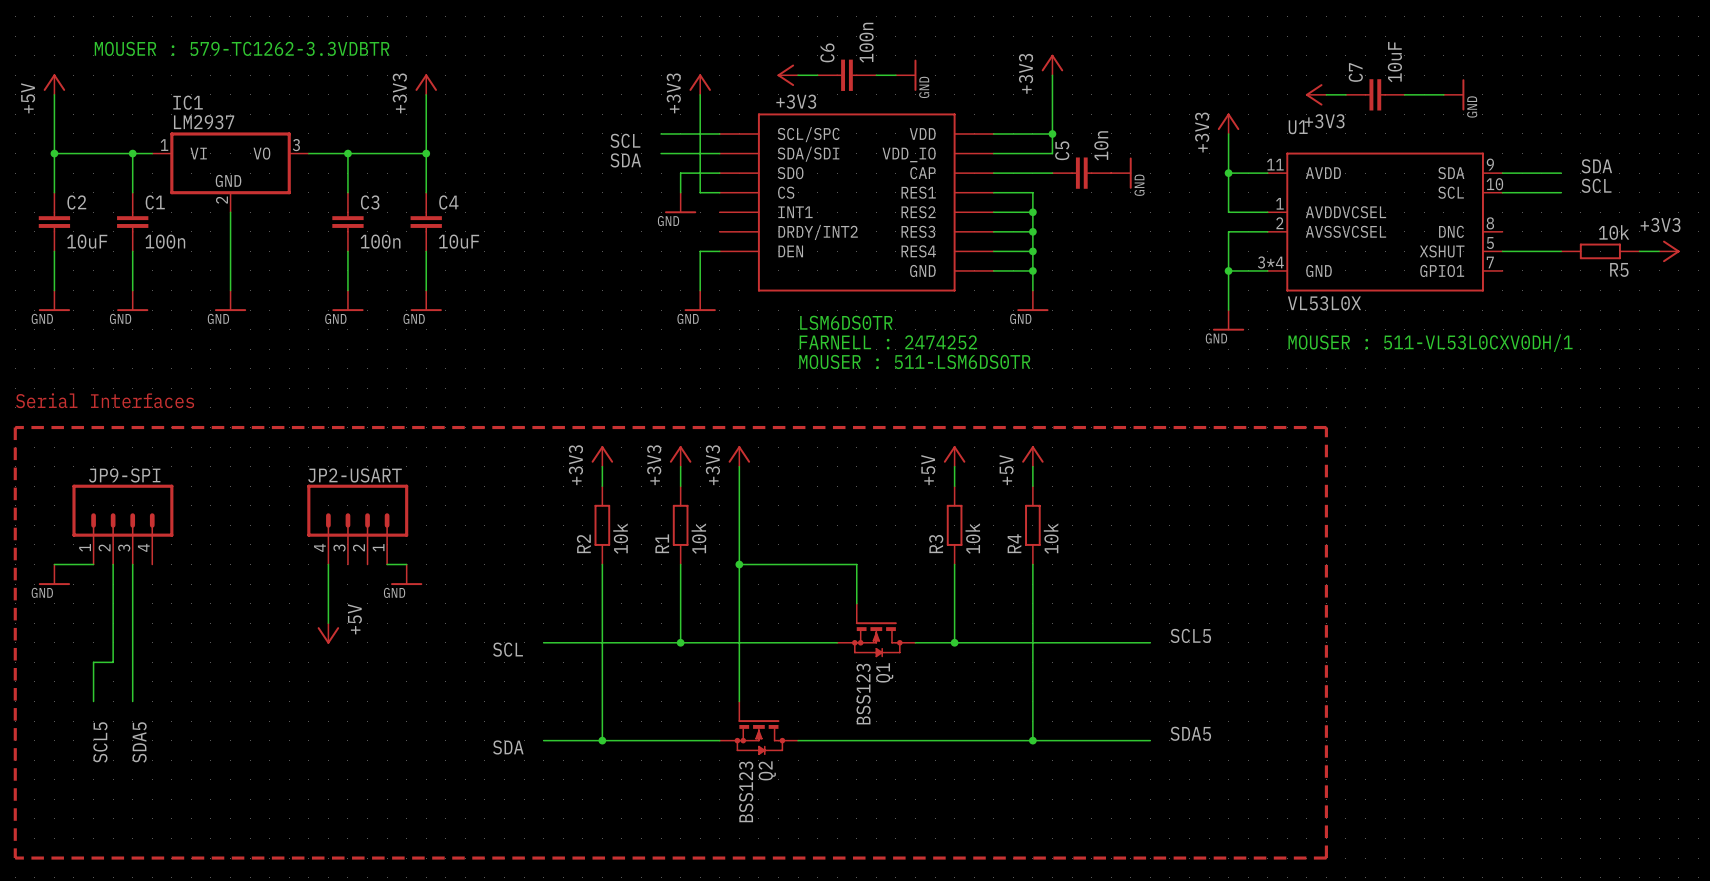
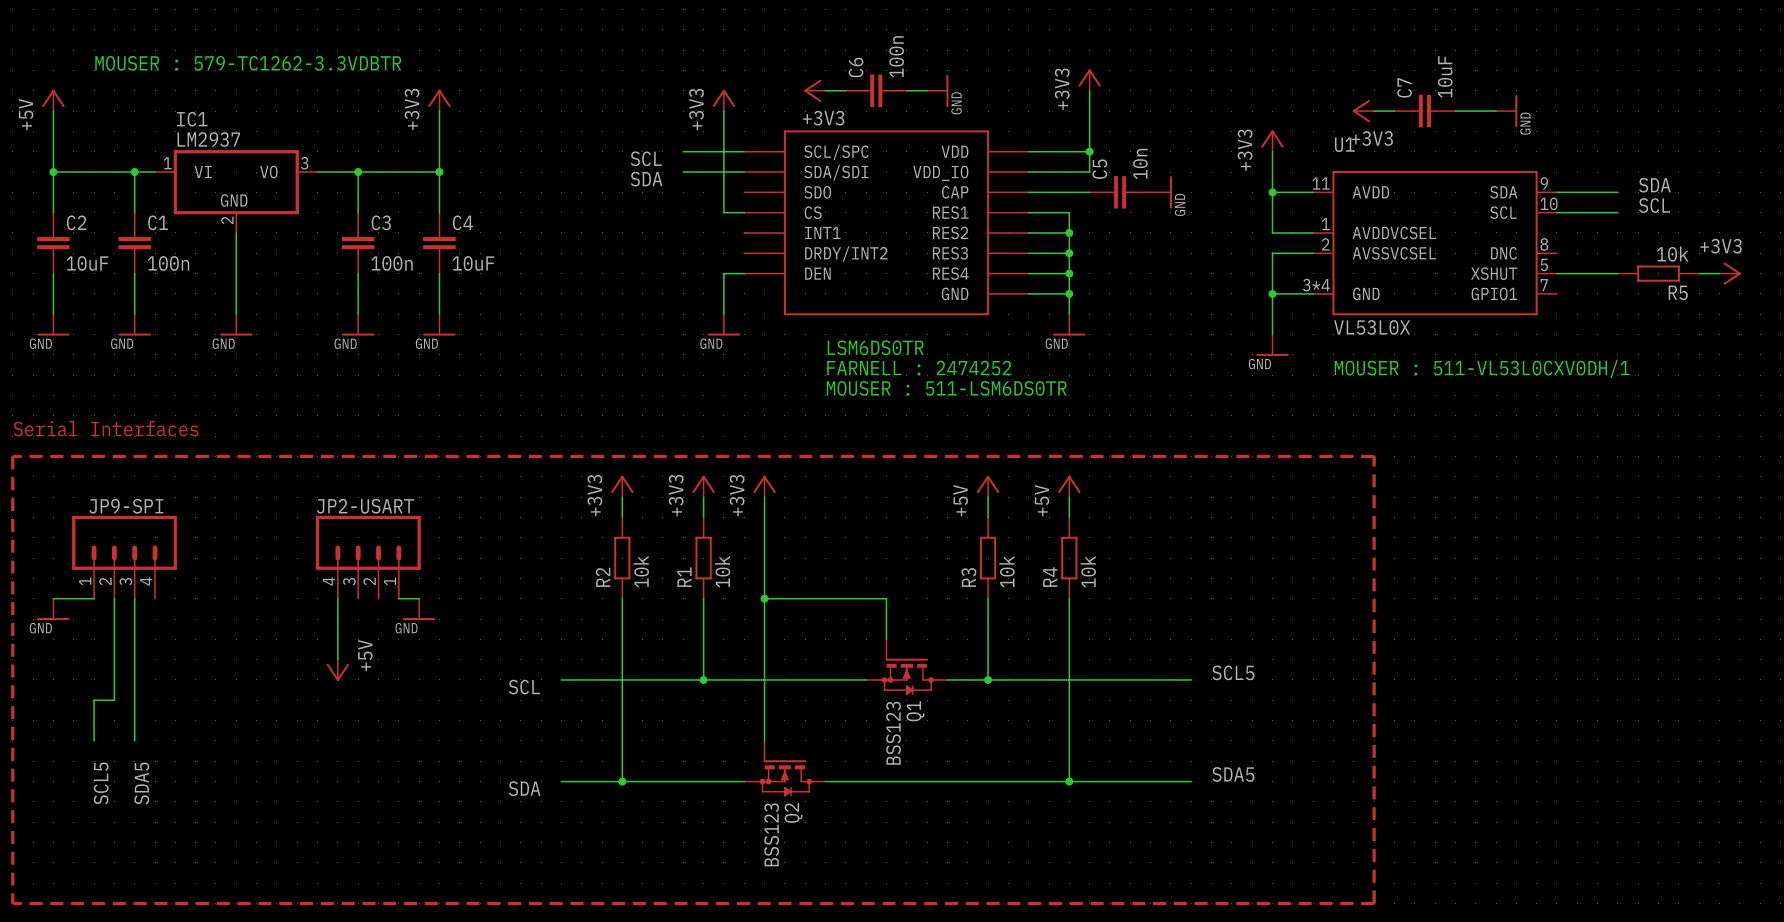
wire: (719, 173) (680, 173) (680, 192) -> none
power symbol: GND (680, 202) -> none

